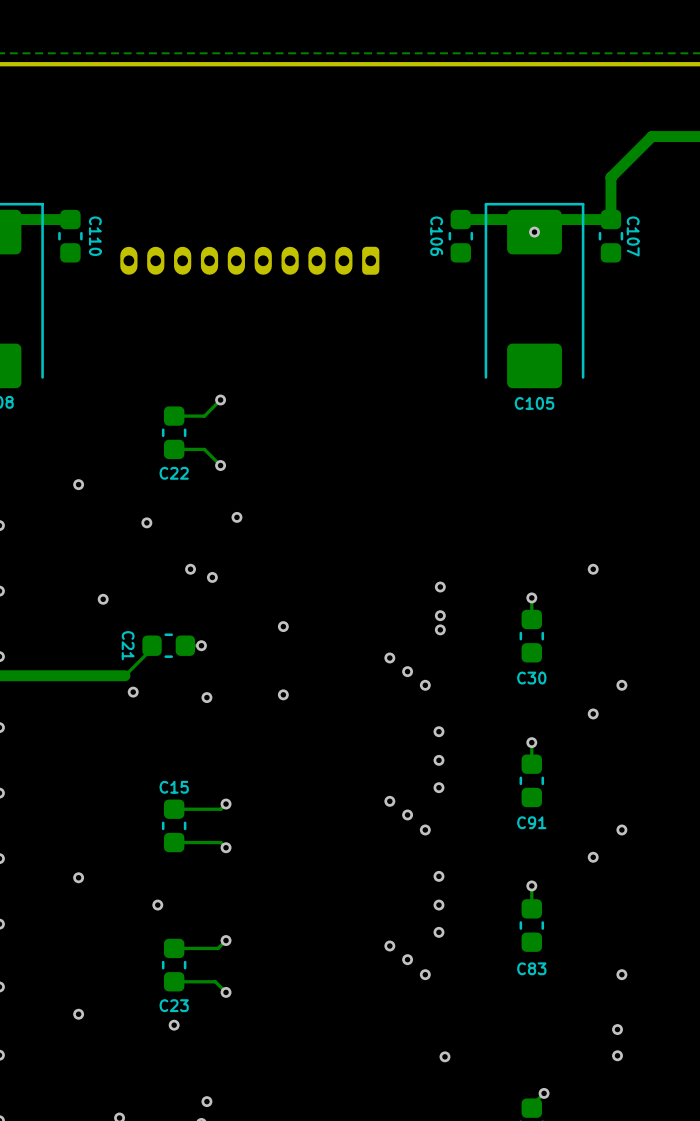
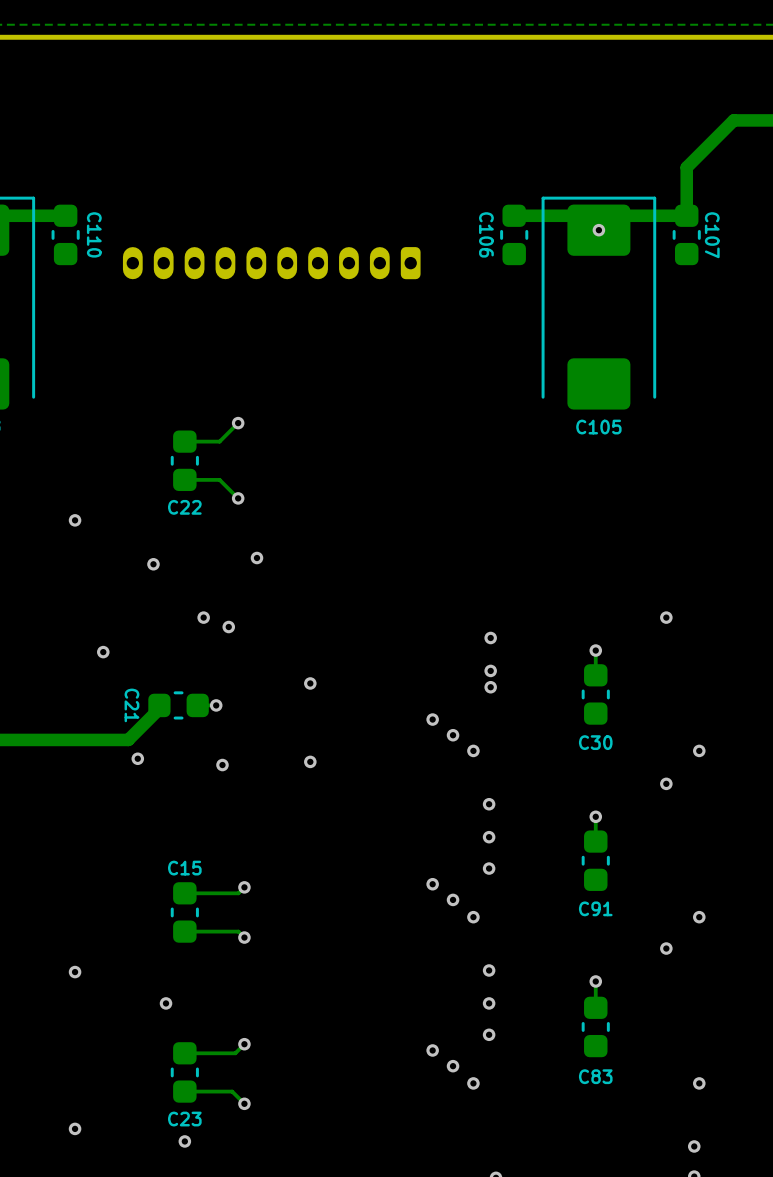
track width: thin (152, 645) (152, 648) (125, 675) -> thick (159, 705) (159, 708) (128, 739)

